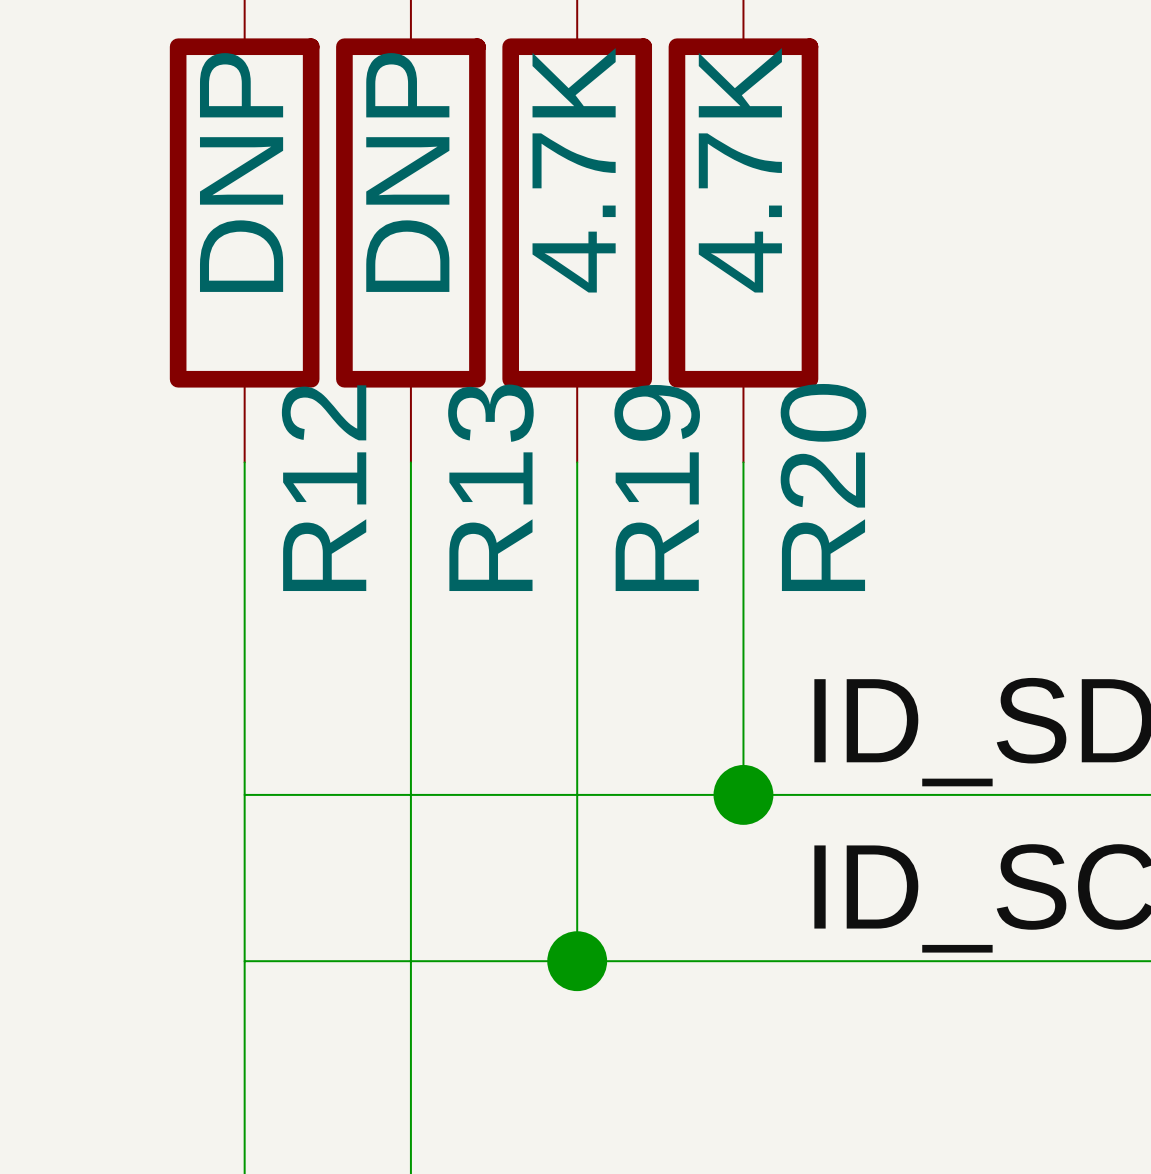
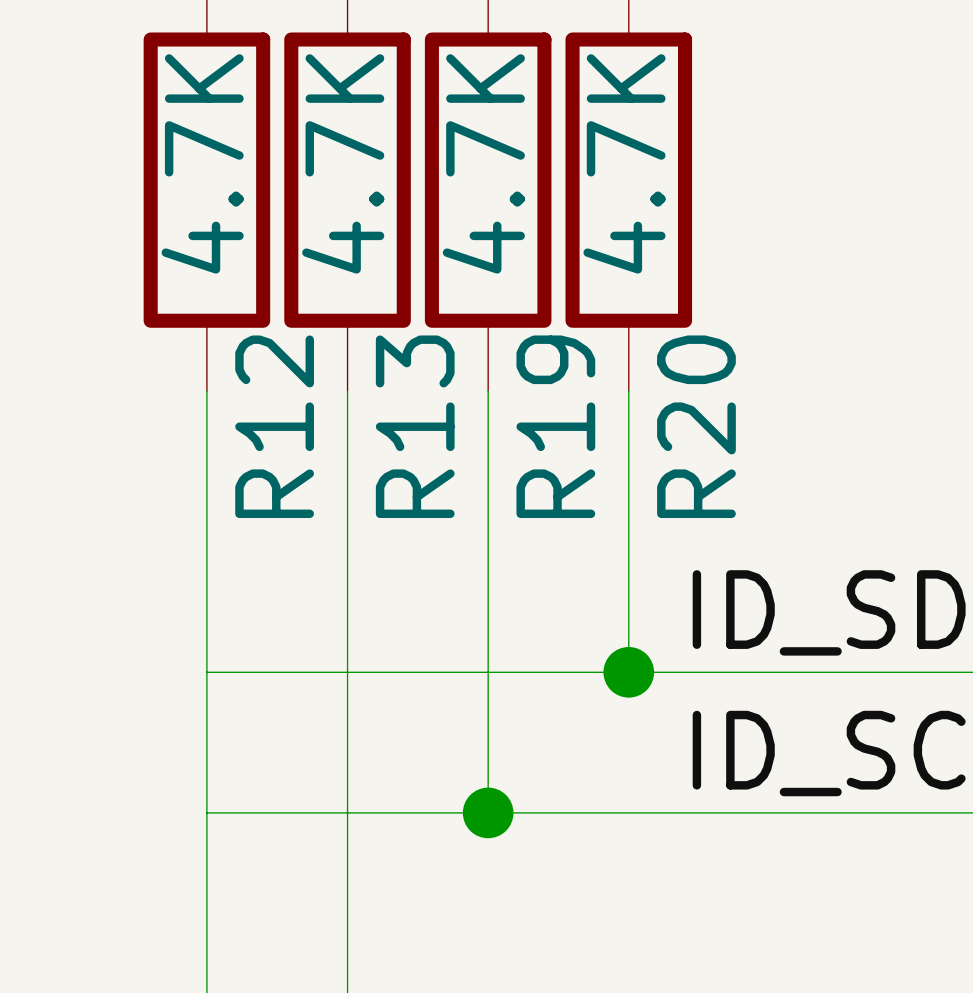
R12 value: DNP (241, 172) -> 4.7K (202, 163)
R13 value: DNP (407, 172) -> 4.7K (343, 163)

